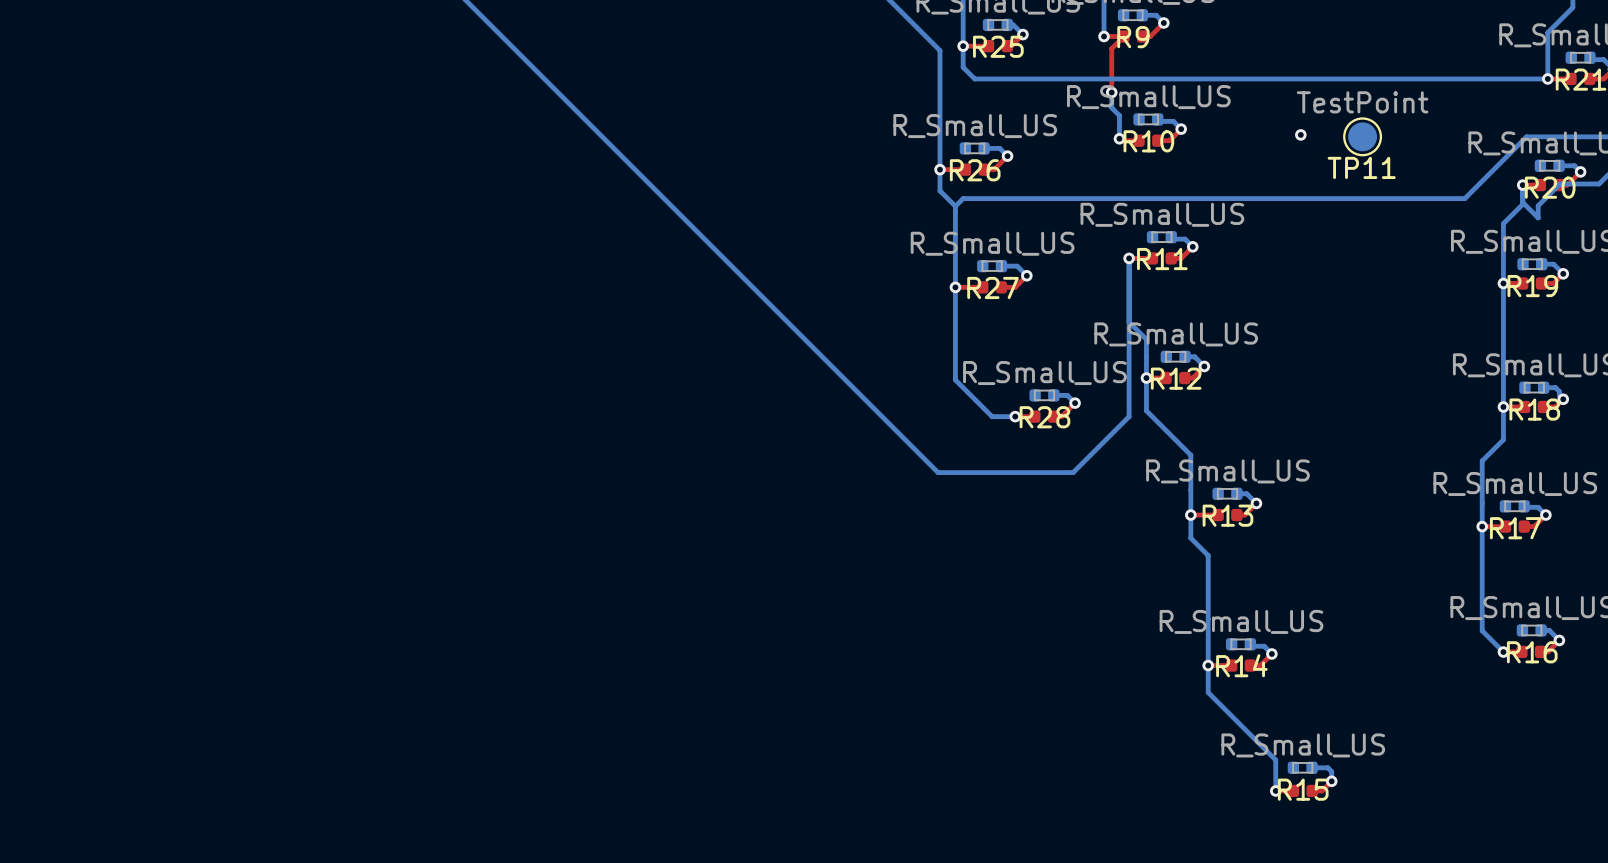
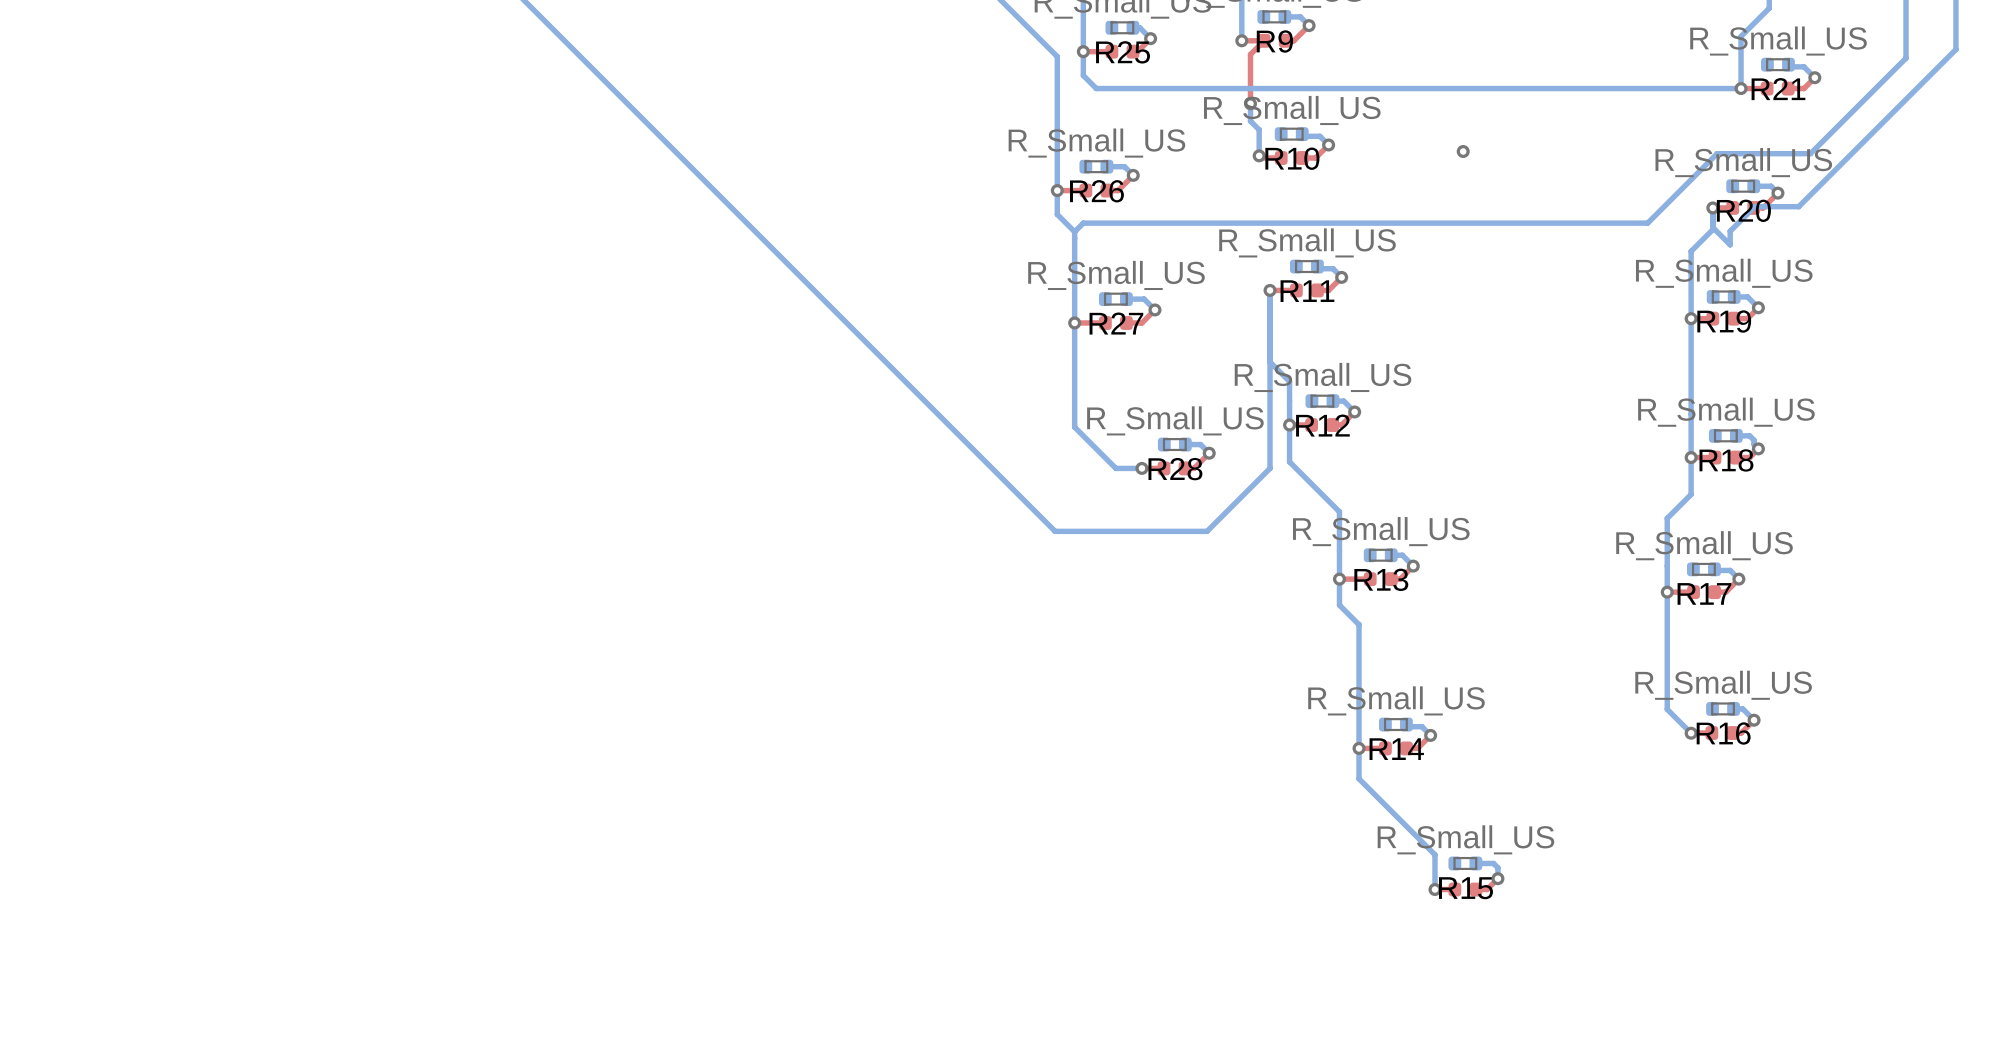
TP11: TestPoint (1362, 136) -> none

